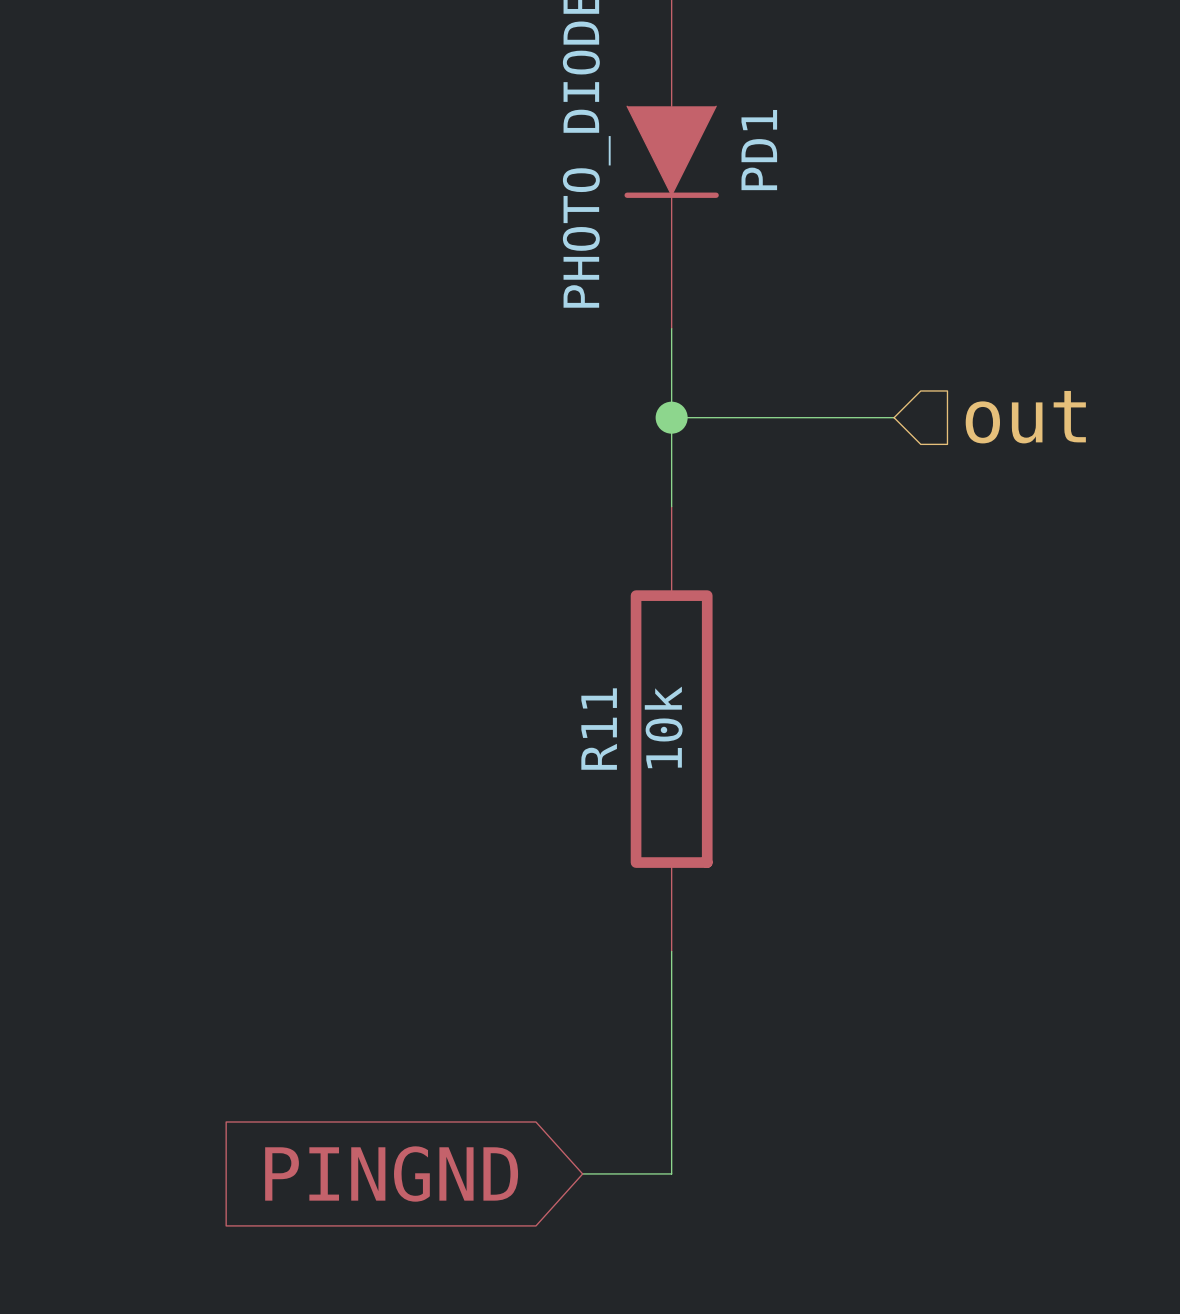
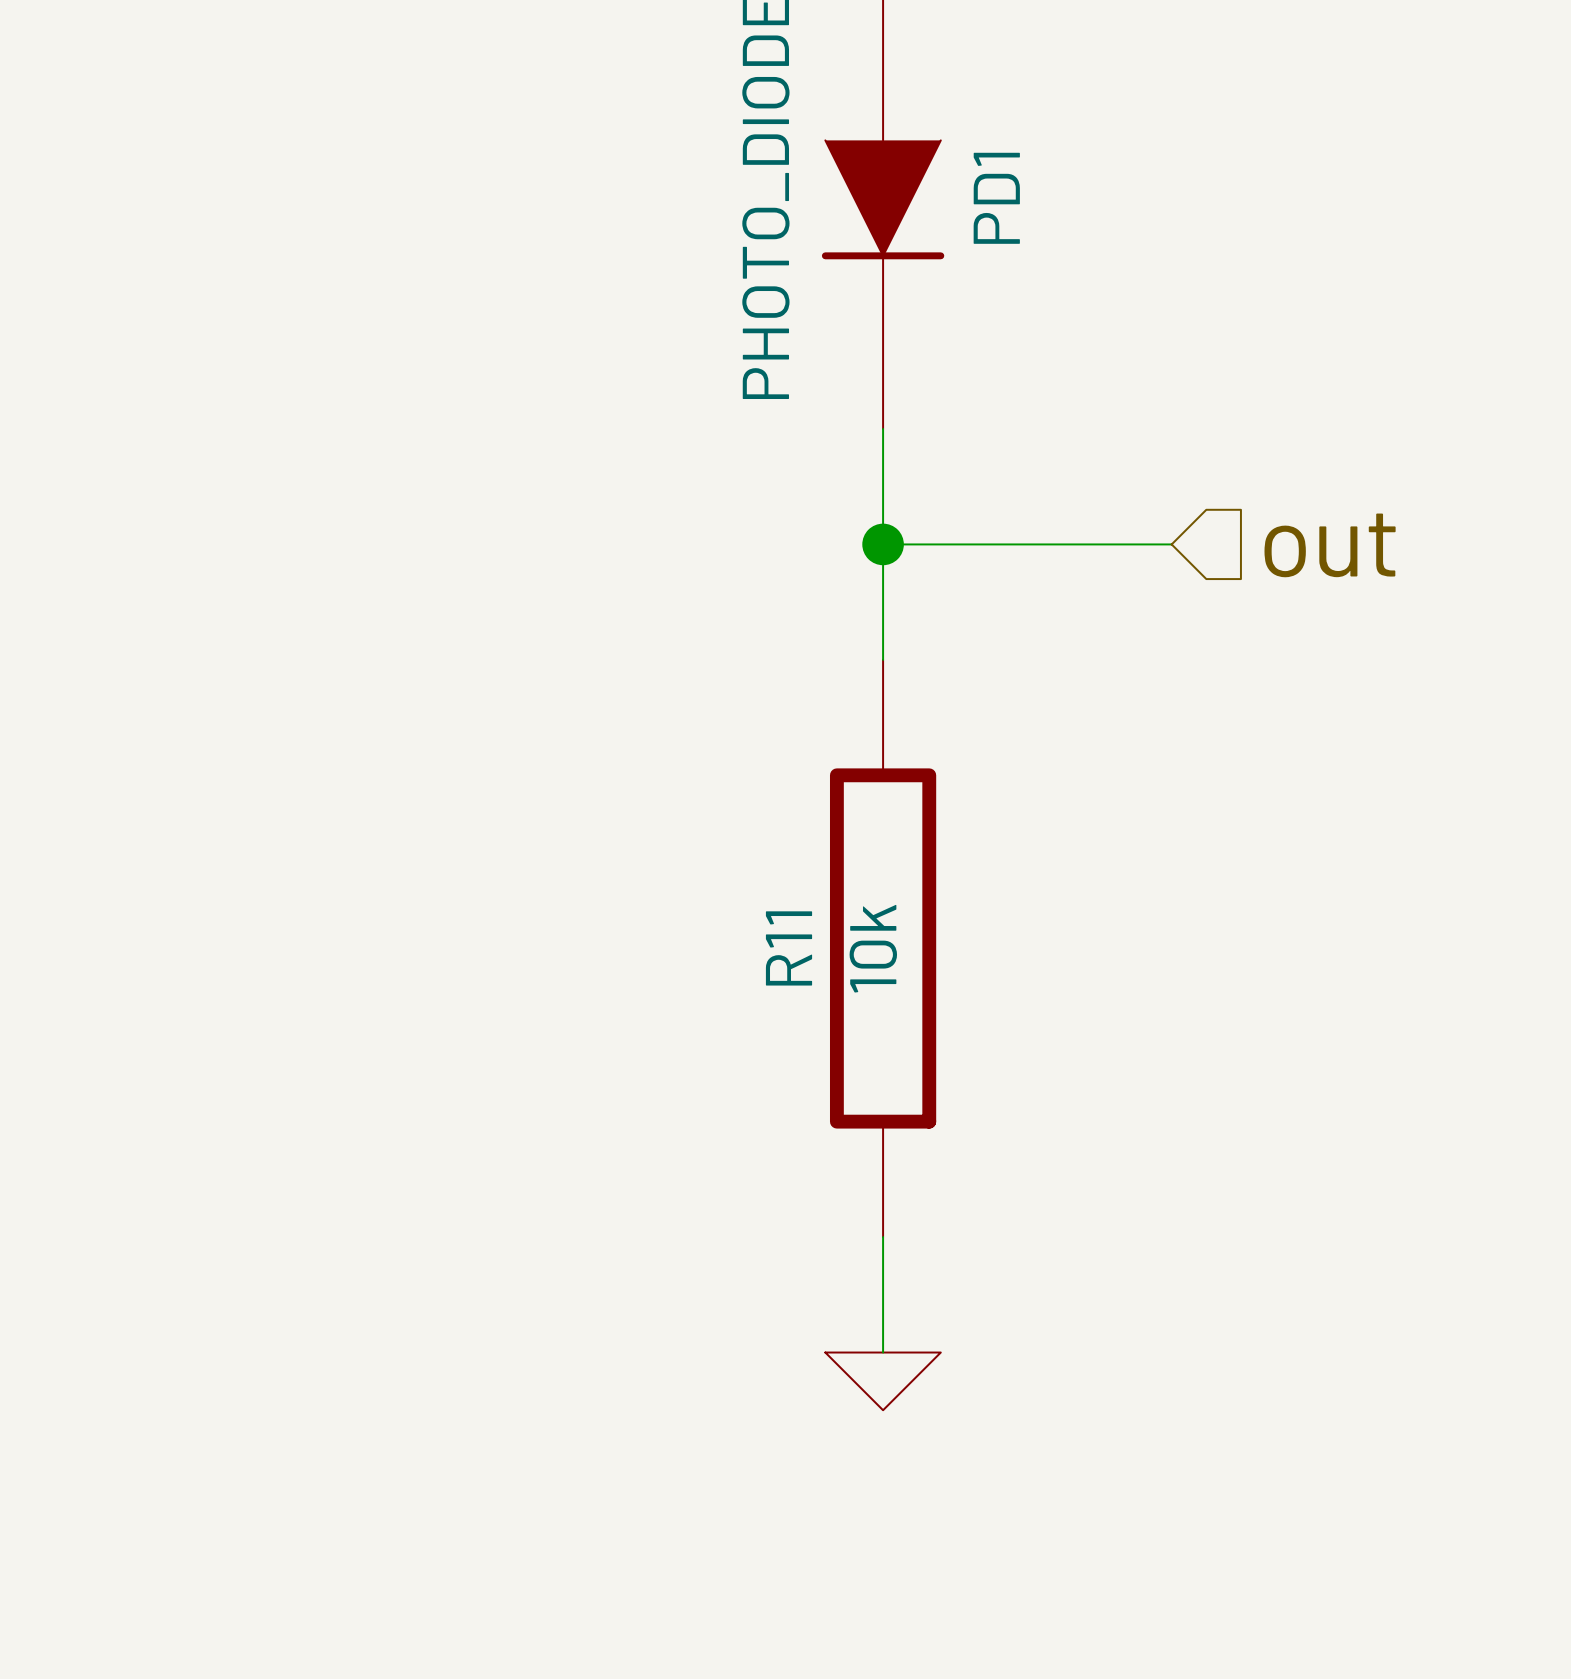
wire: (671, 1040) (671, 1173) (582, 1173) -> none
power symbol: none -> (883, 1381)
global label: PINGND (391, 1174) -> none

